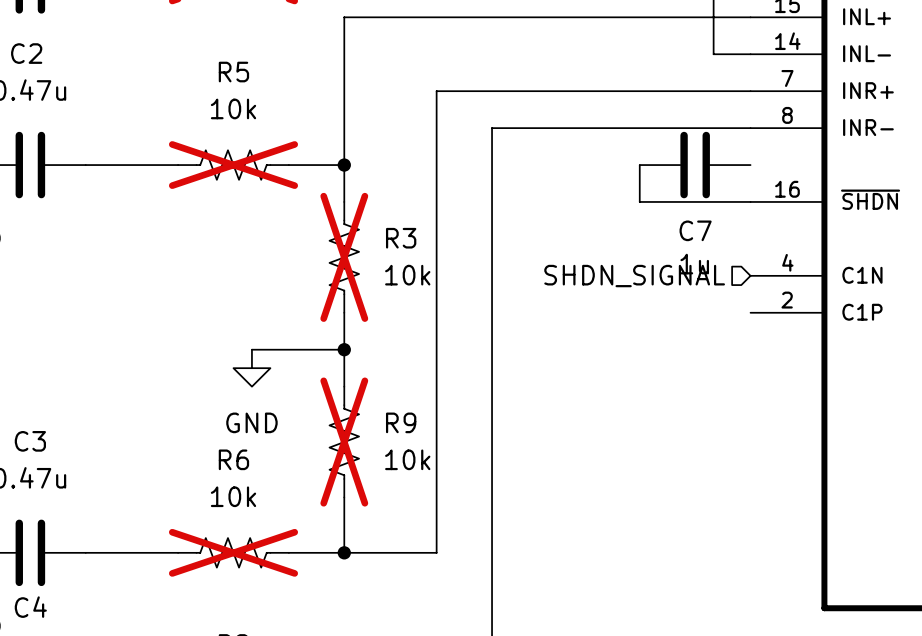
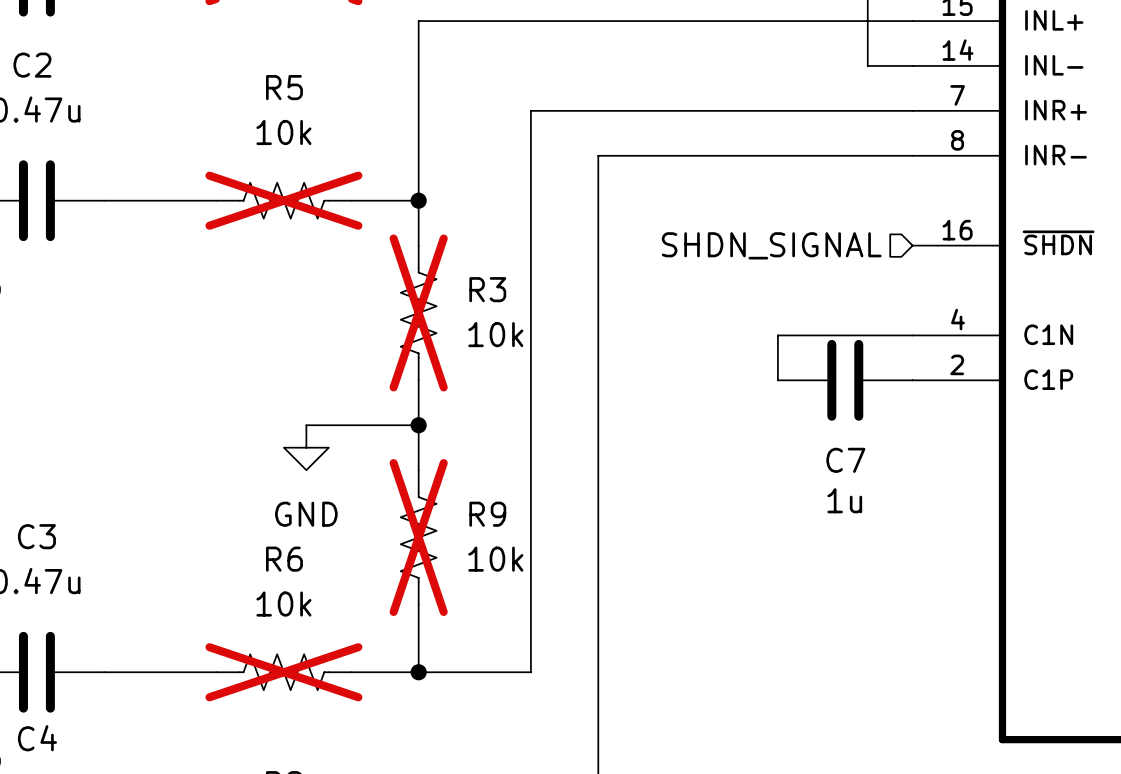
wire: (639, 165) (639, 201) (750, 201) -> none
C7 position: (695, 165) -> (845, 380)
wire: none -> (912, 335) (777, 335) (777, 380)
hierarchical label position: SHDN_SIGNAL (634, 276) -> SHDN_SIGNAL (771, 245)

